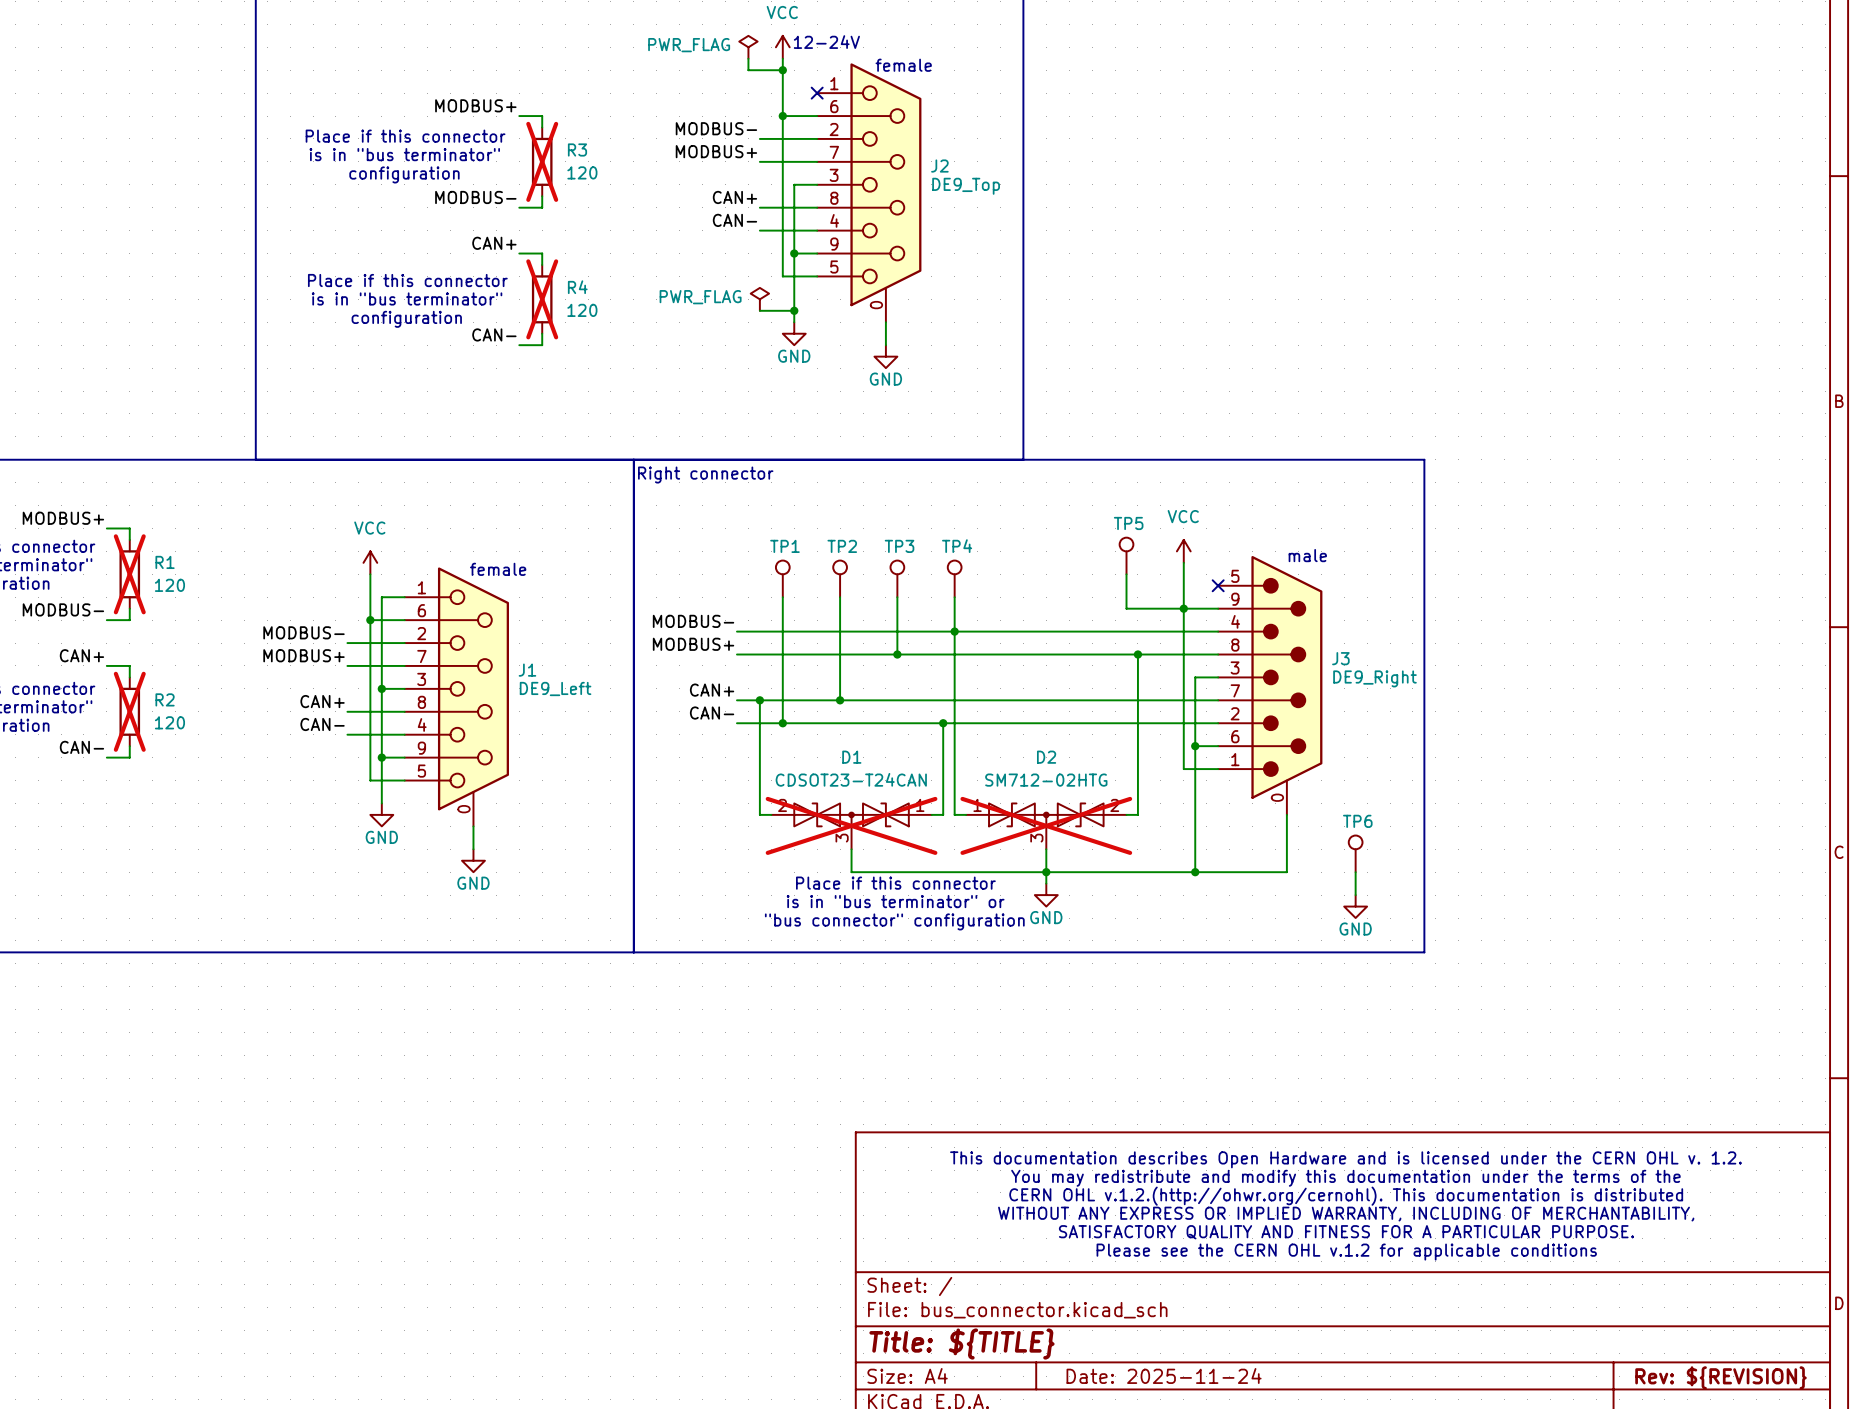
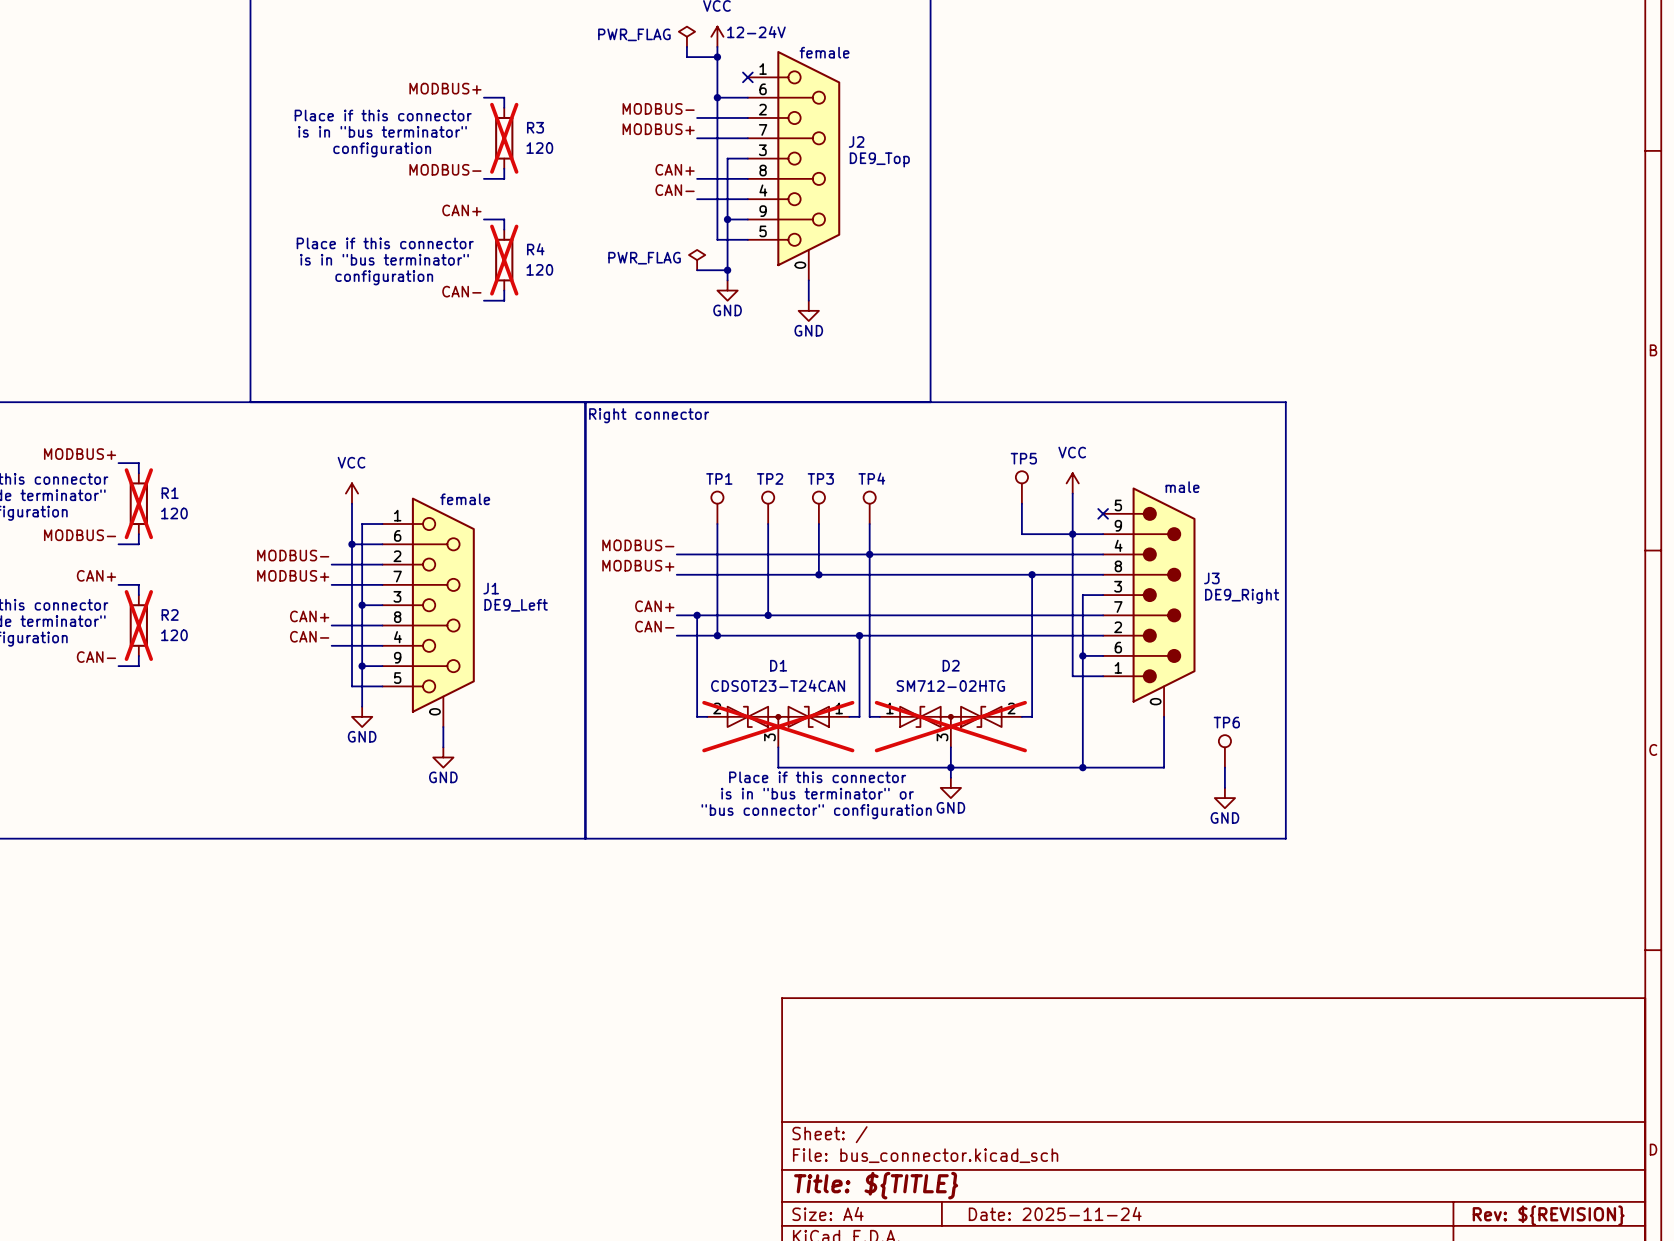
text: This documentation describes Open Hardware and is licensed under the CERN OHL v. 1.2. (1345, 1159) -> none
text: You may redistribute and modify this documentation under the terms of the (1345, 1178) -> none
text: CERN OHL v.1.2.(http://ohwr.org/cernohl). This documentation is distributed (1346, 1196) -> none
text: WITHOUT ANY EXPRESS OR IMPLIED WARRANTY, INCLUDING OF MERCHANTABILITY, (1346, 1214) -> none
text: SATISFACTORY QUALITY AND FITNESS FOR A PARTICULAR PURPOSE. (1346, 1232) -> none
text: Please see the CERN OHL v.1.2 for applicable conditions (1346, 1252) -> none

